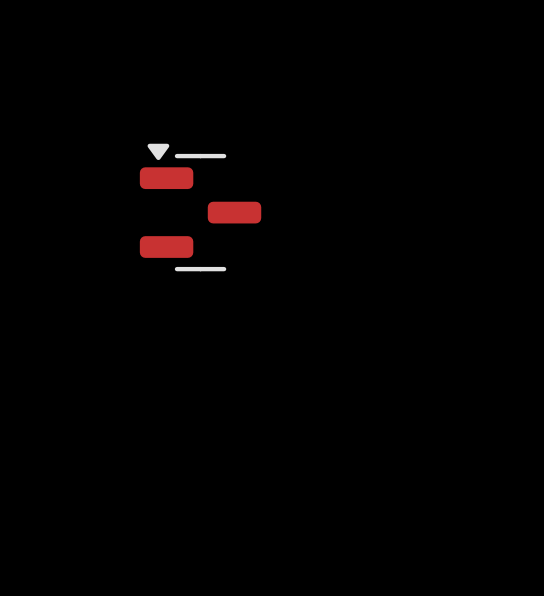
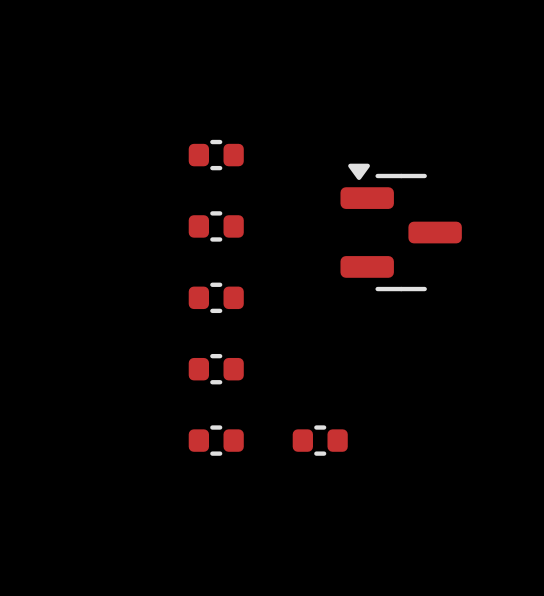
part footprint: [139, 143, 262, 272] -> [188, 211, 244, 242]
part: none -> (216, 155)
part: none -> (401, 227)
part: none -> (216, 297)
part: none -> (216, 369)
part: none -> (216, 440)
part: none -> (320, 440)

